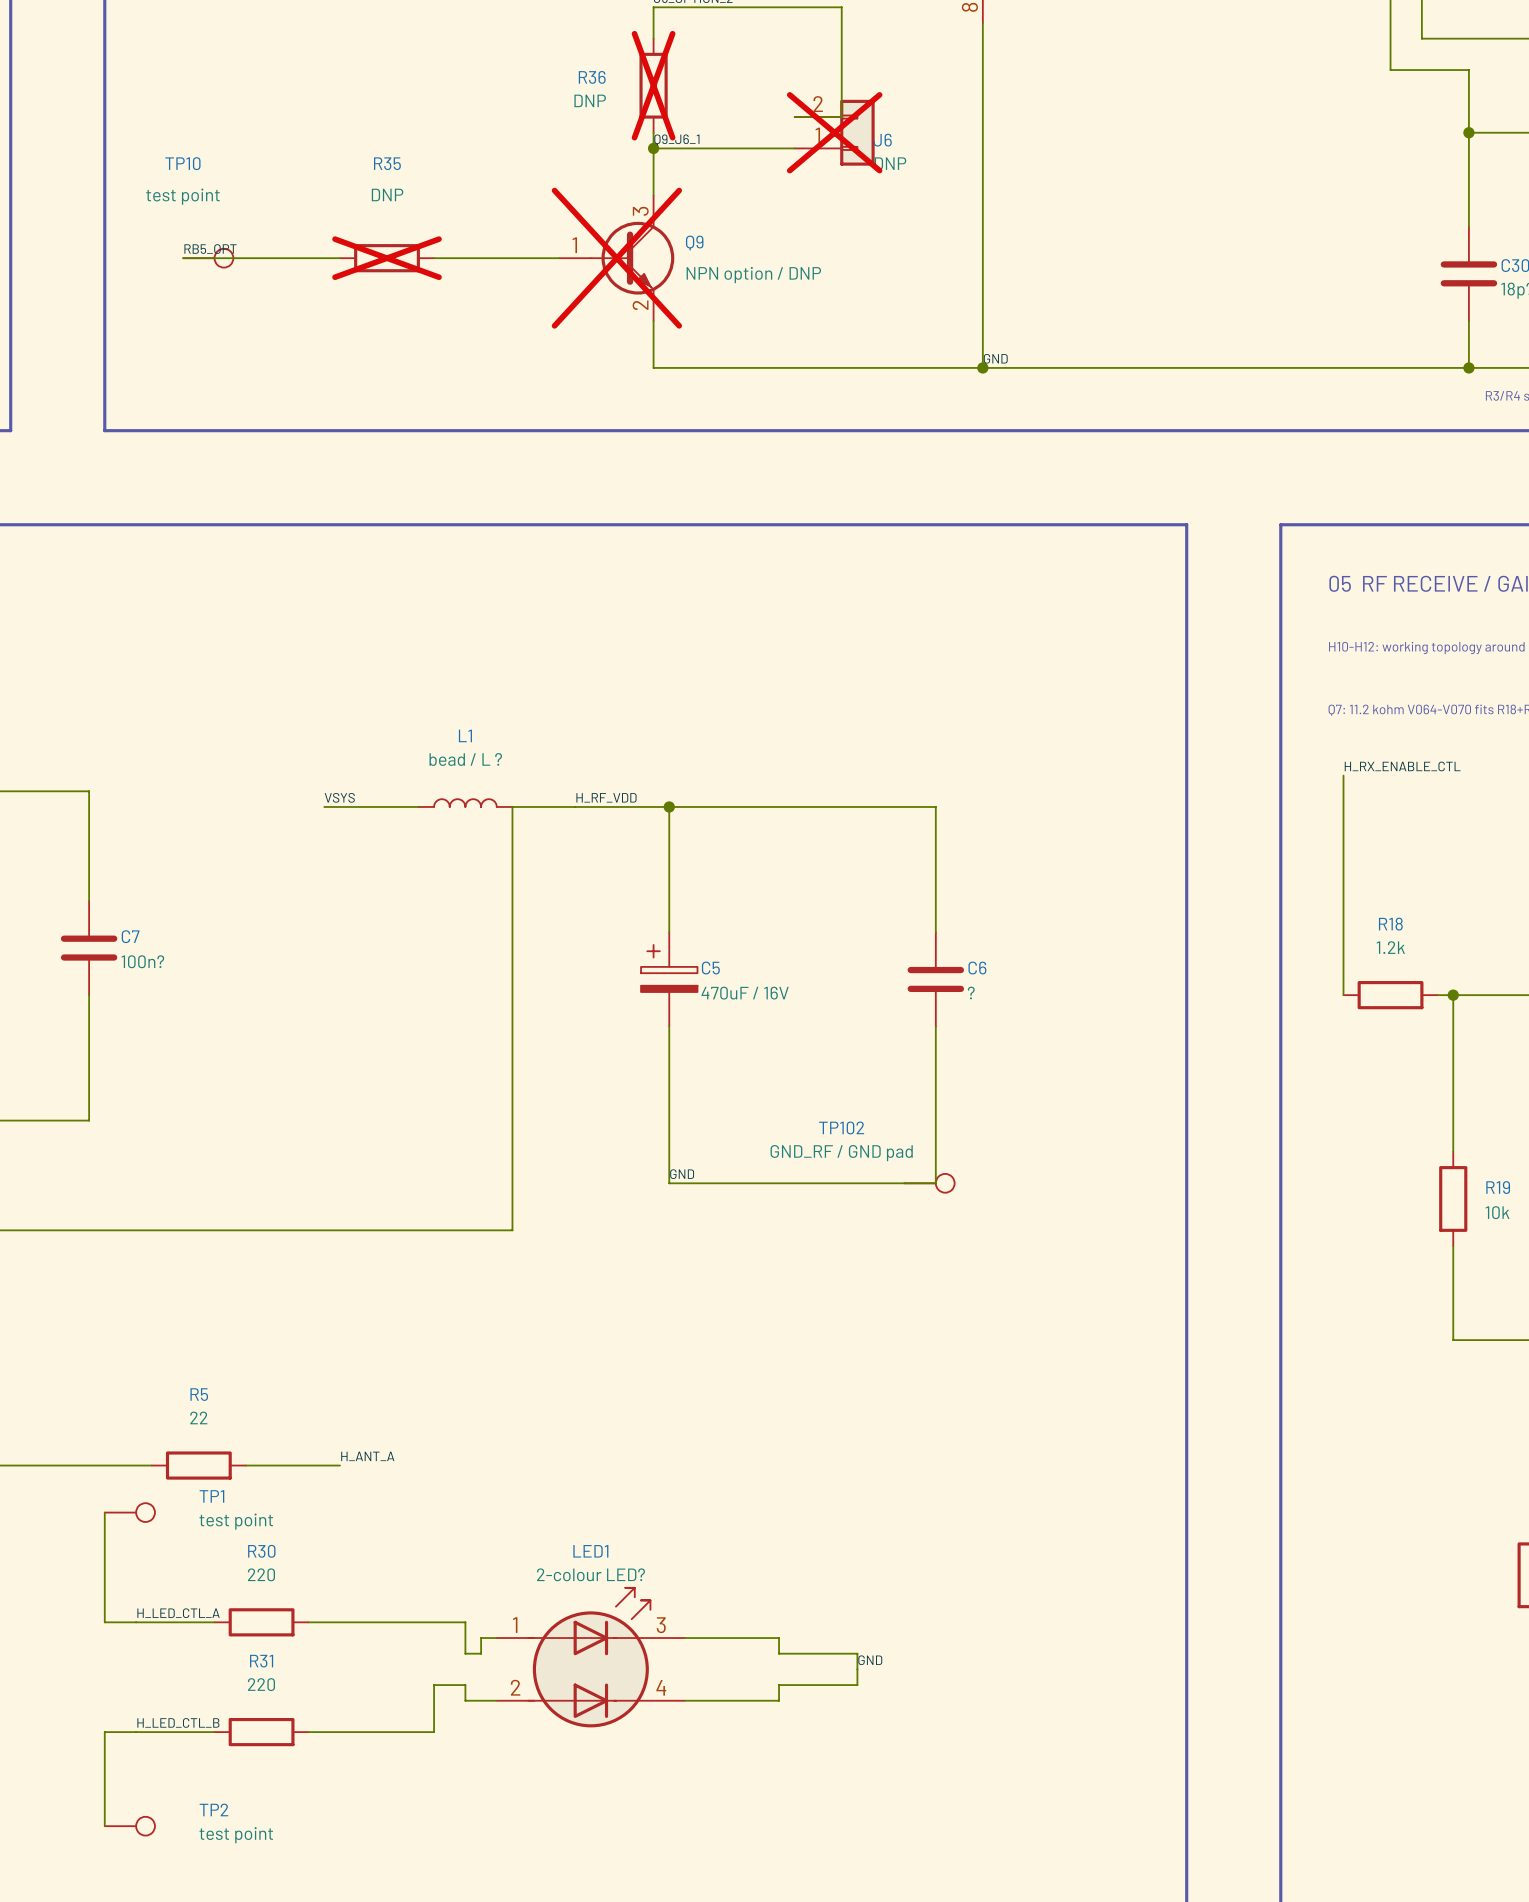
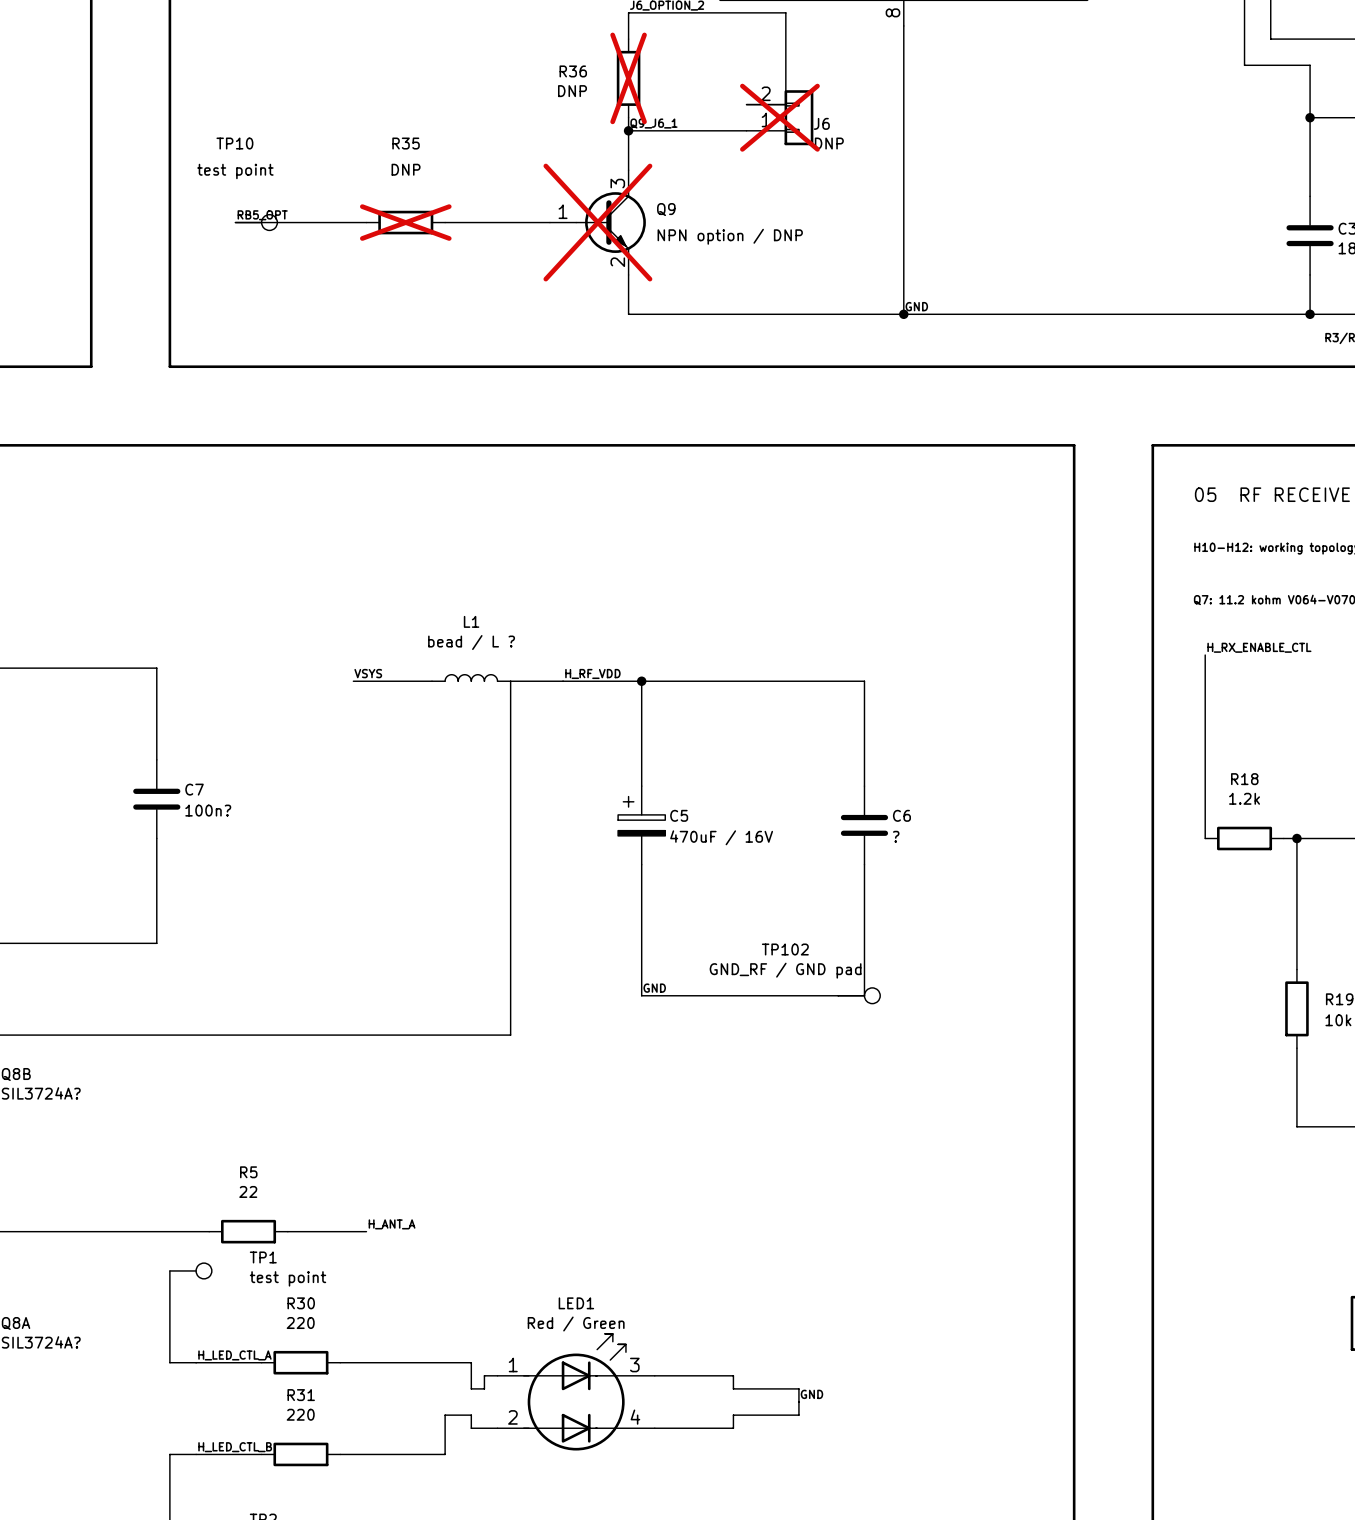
LED1 value: 2-colour LED? (590, 1574) -> Red / Green (576, 1324)

